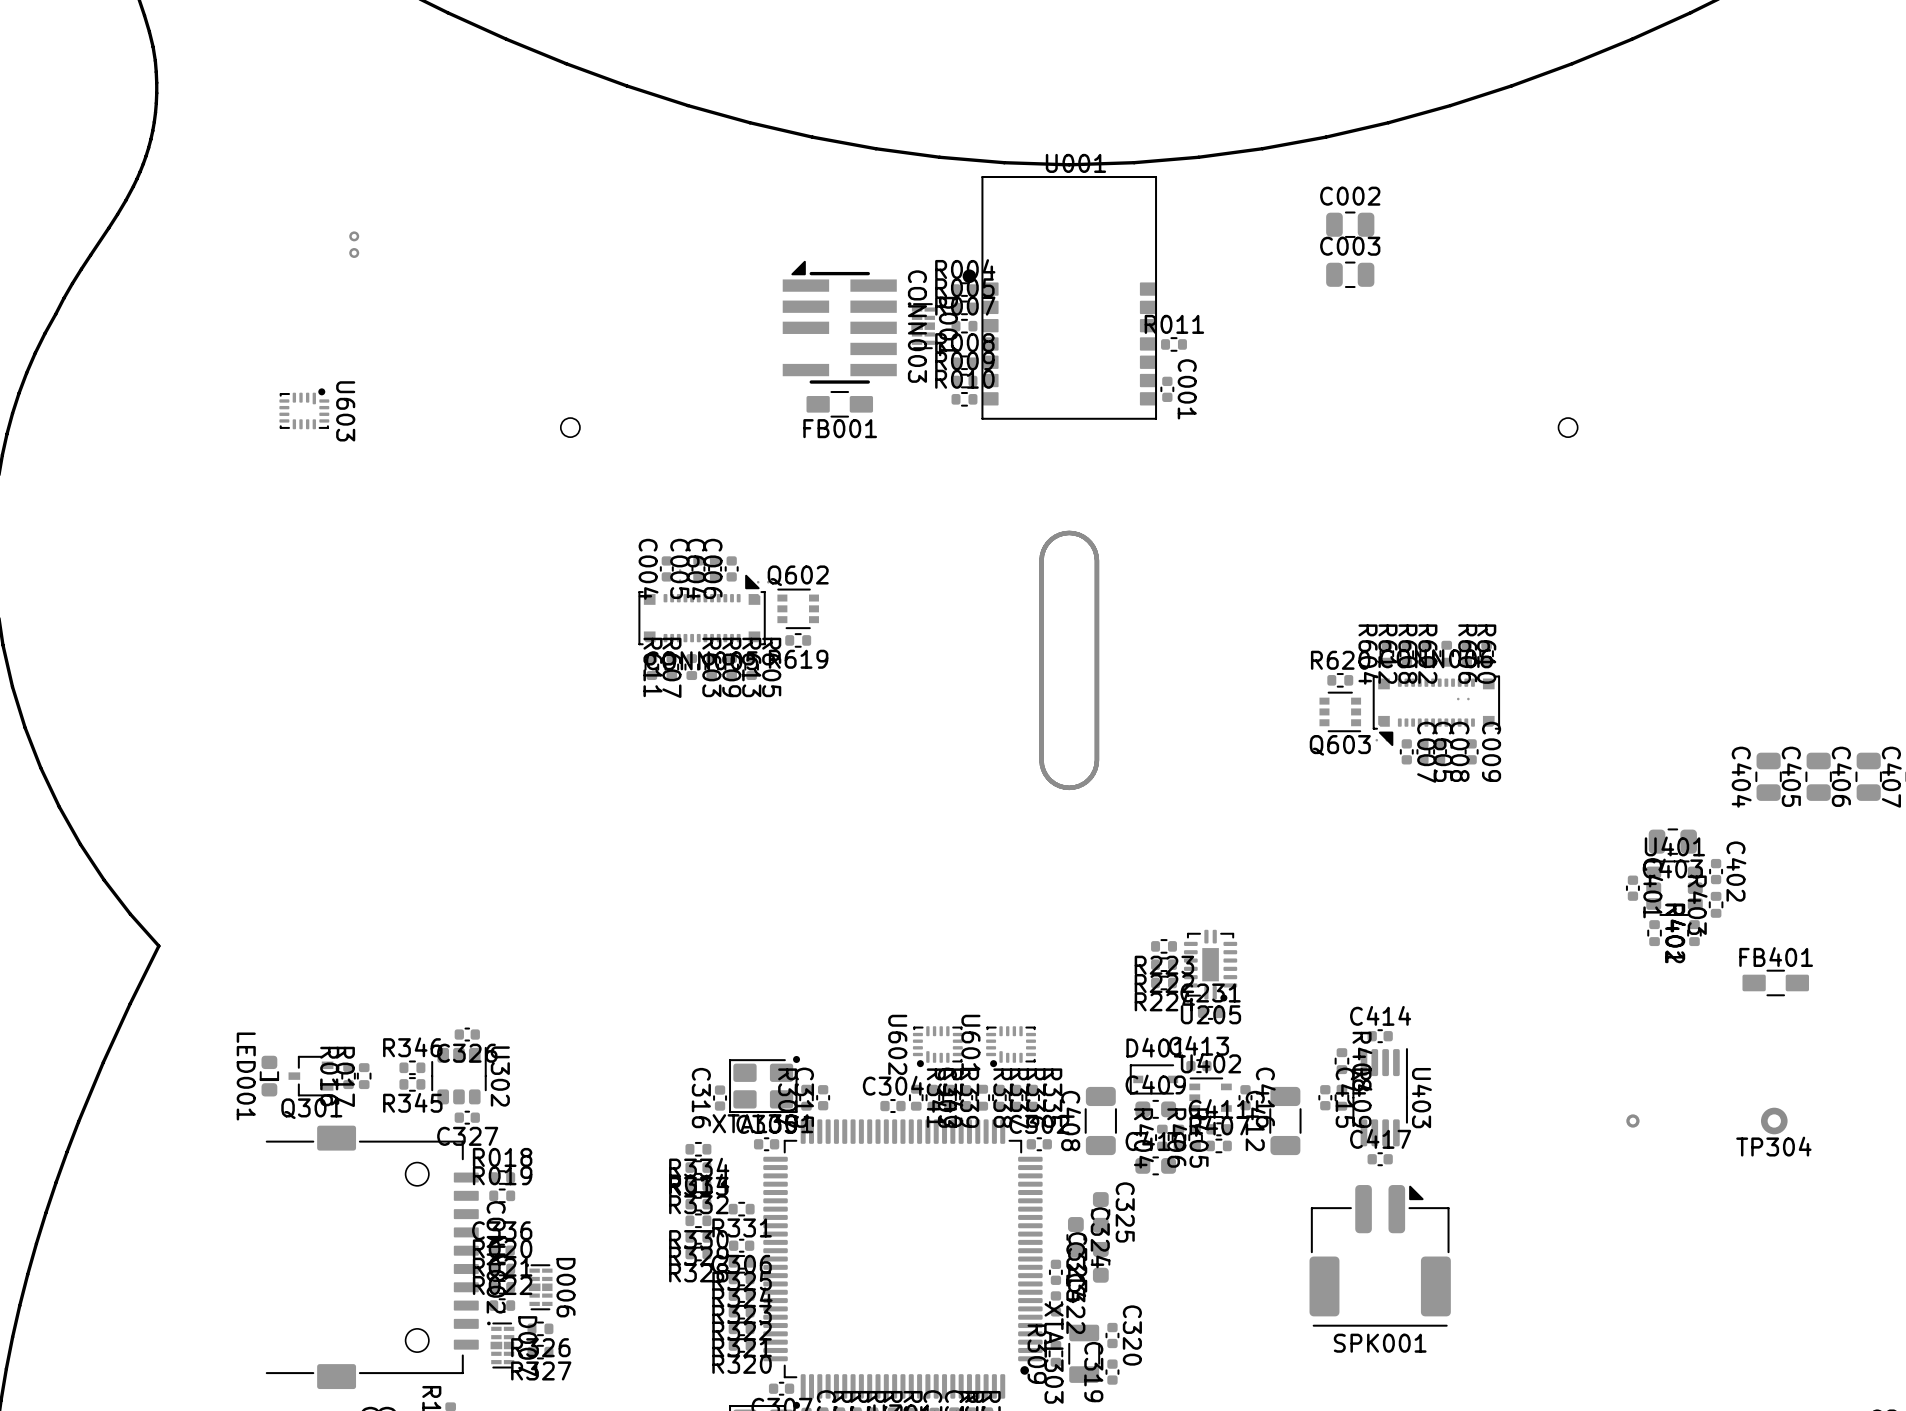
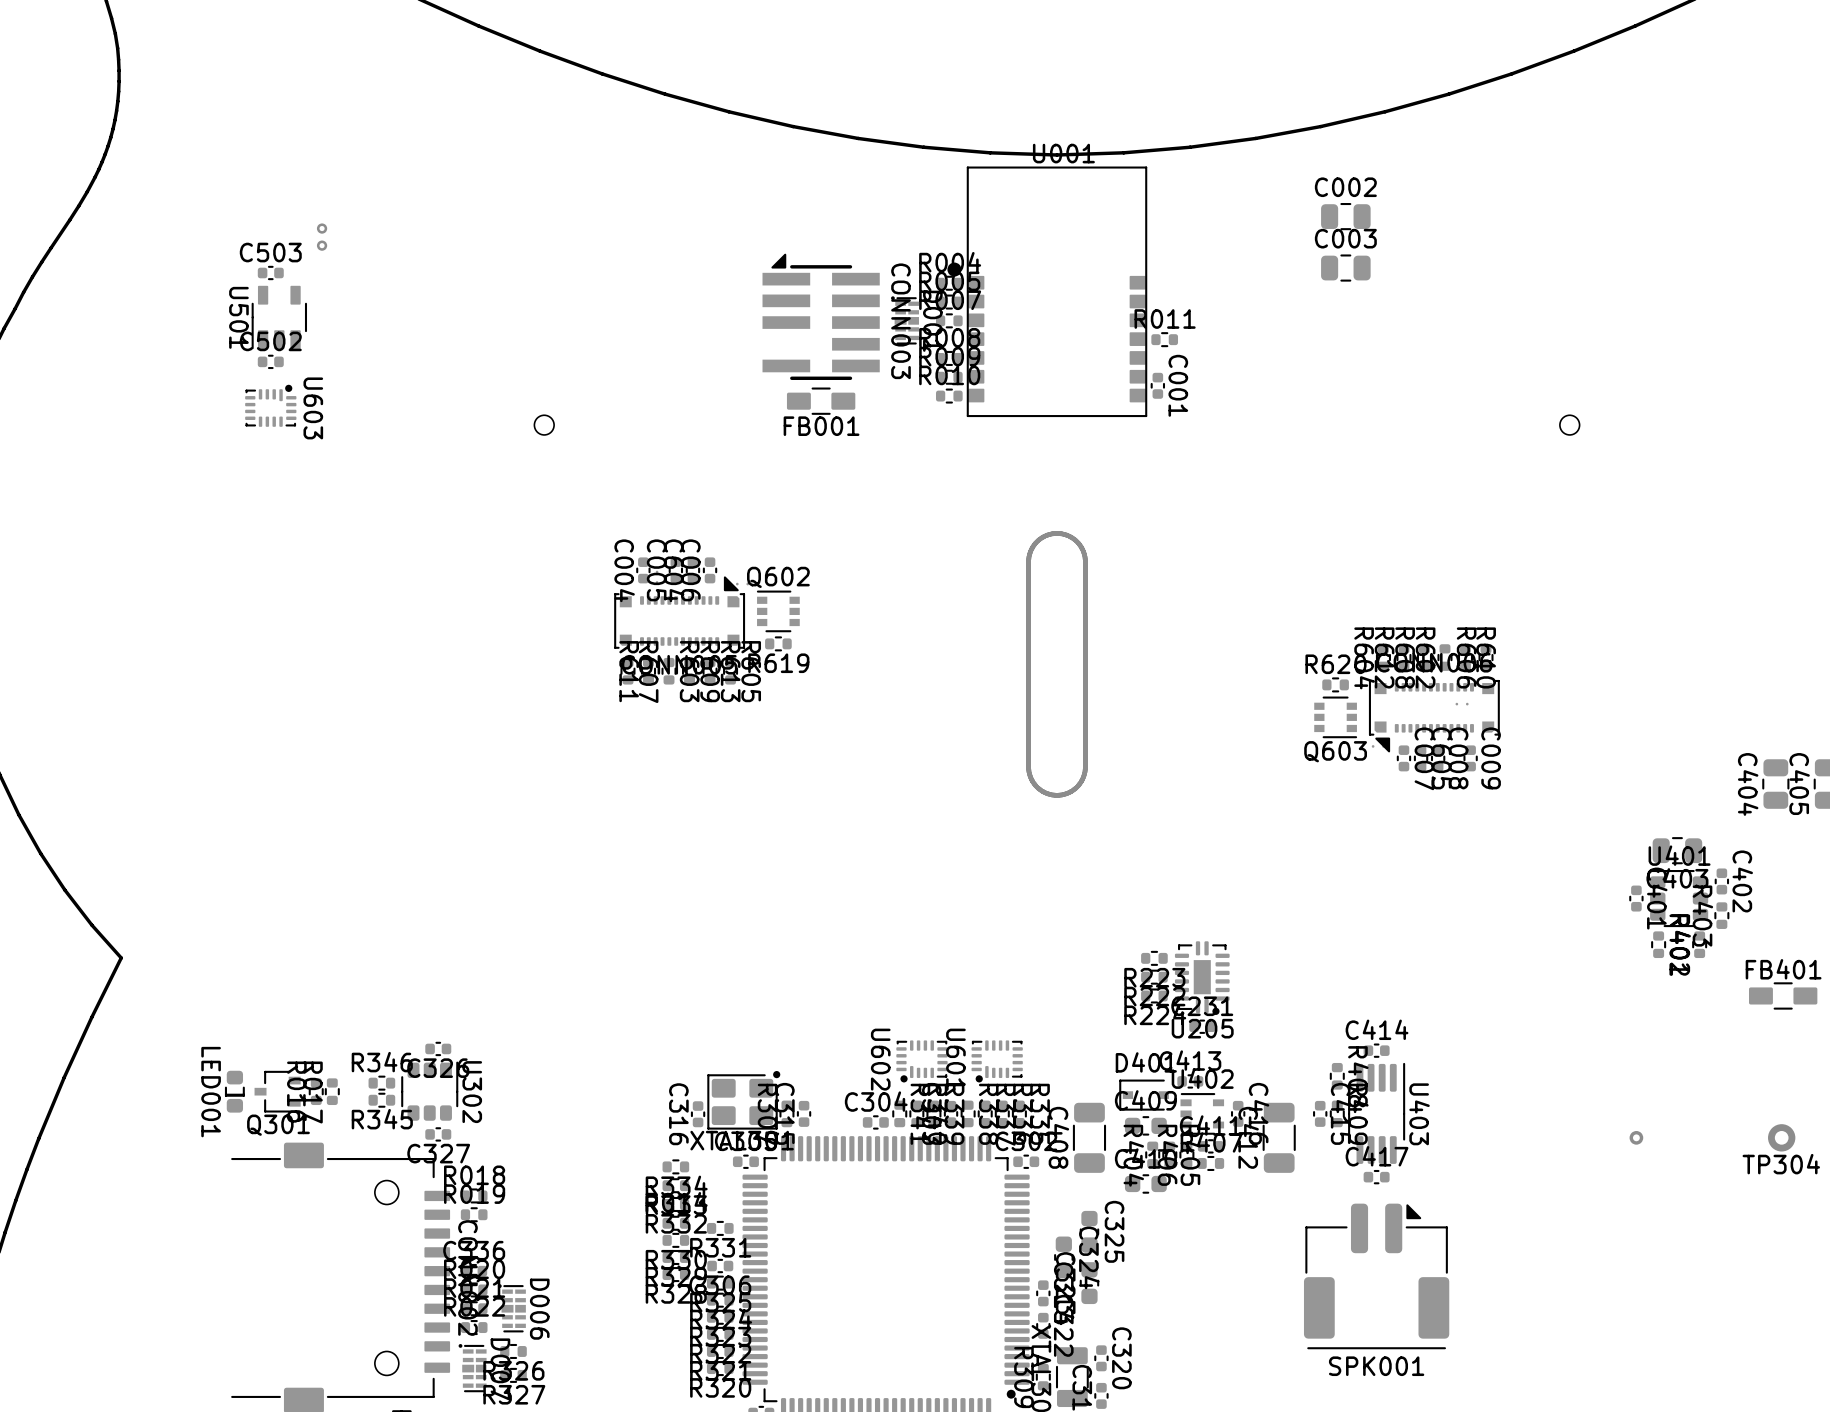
C503: none -> (270, 272)
U501: none -> (279, 317)
C502: none -> (270, 361)

